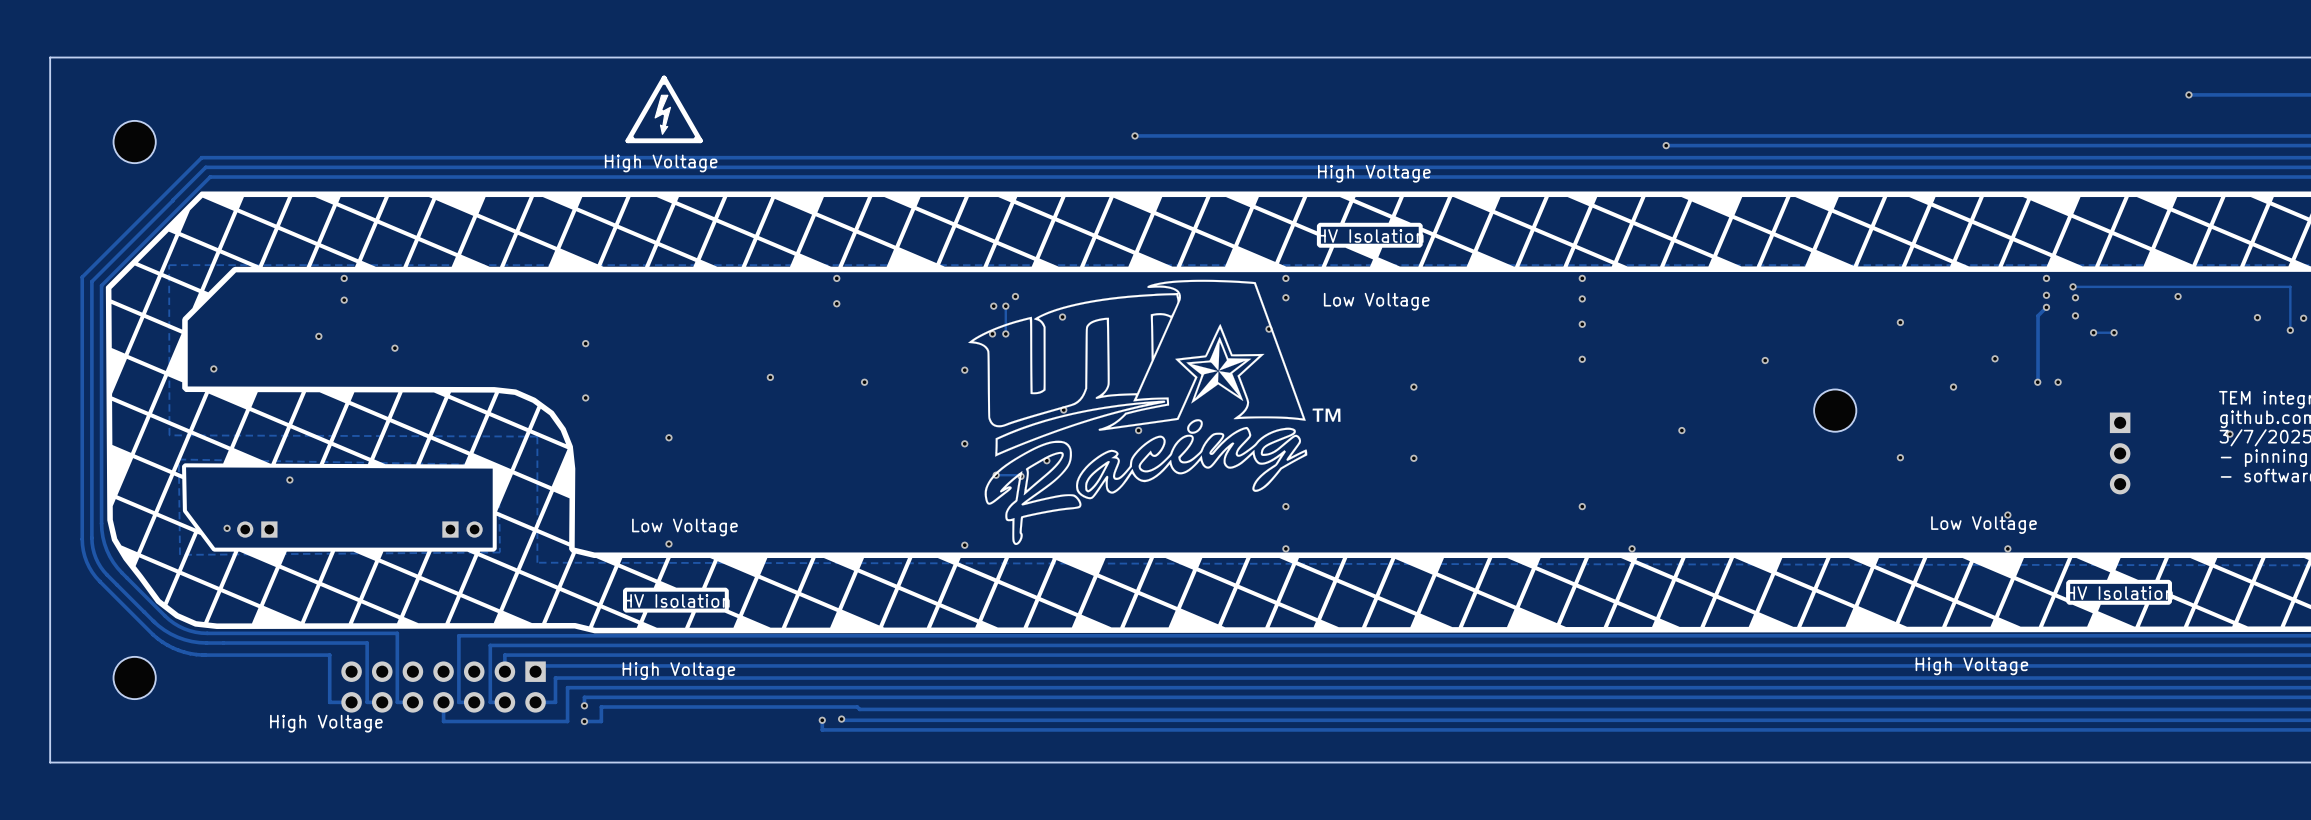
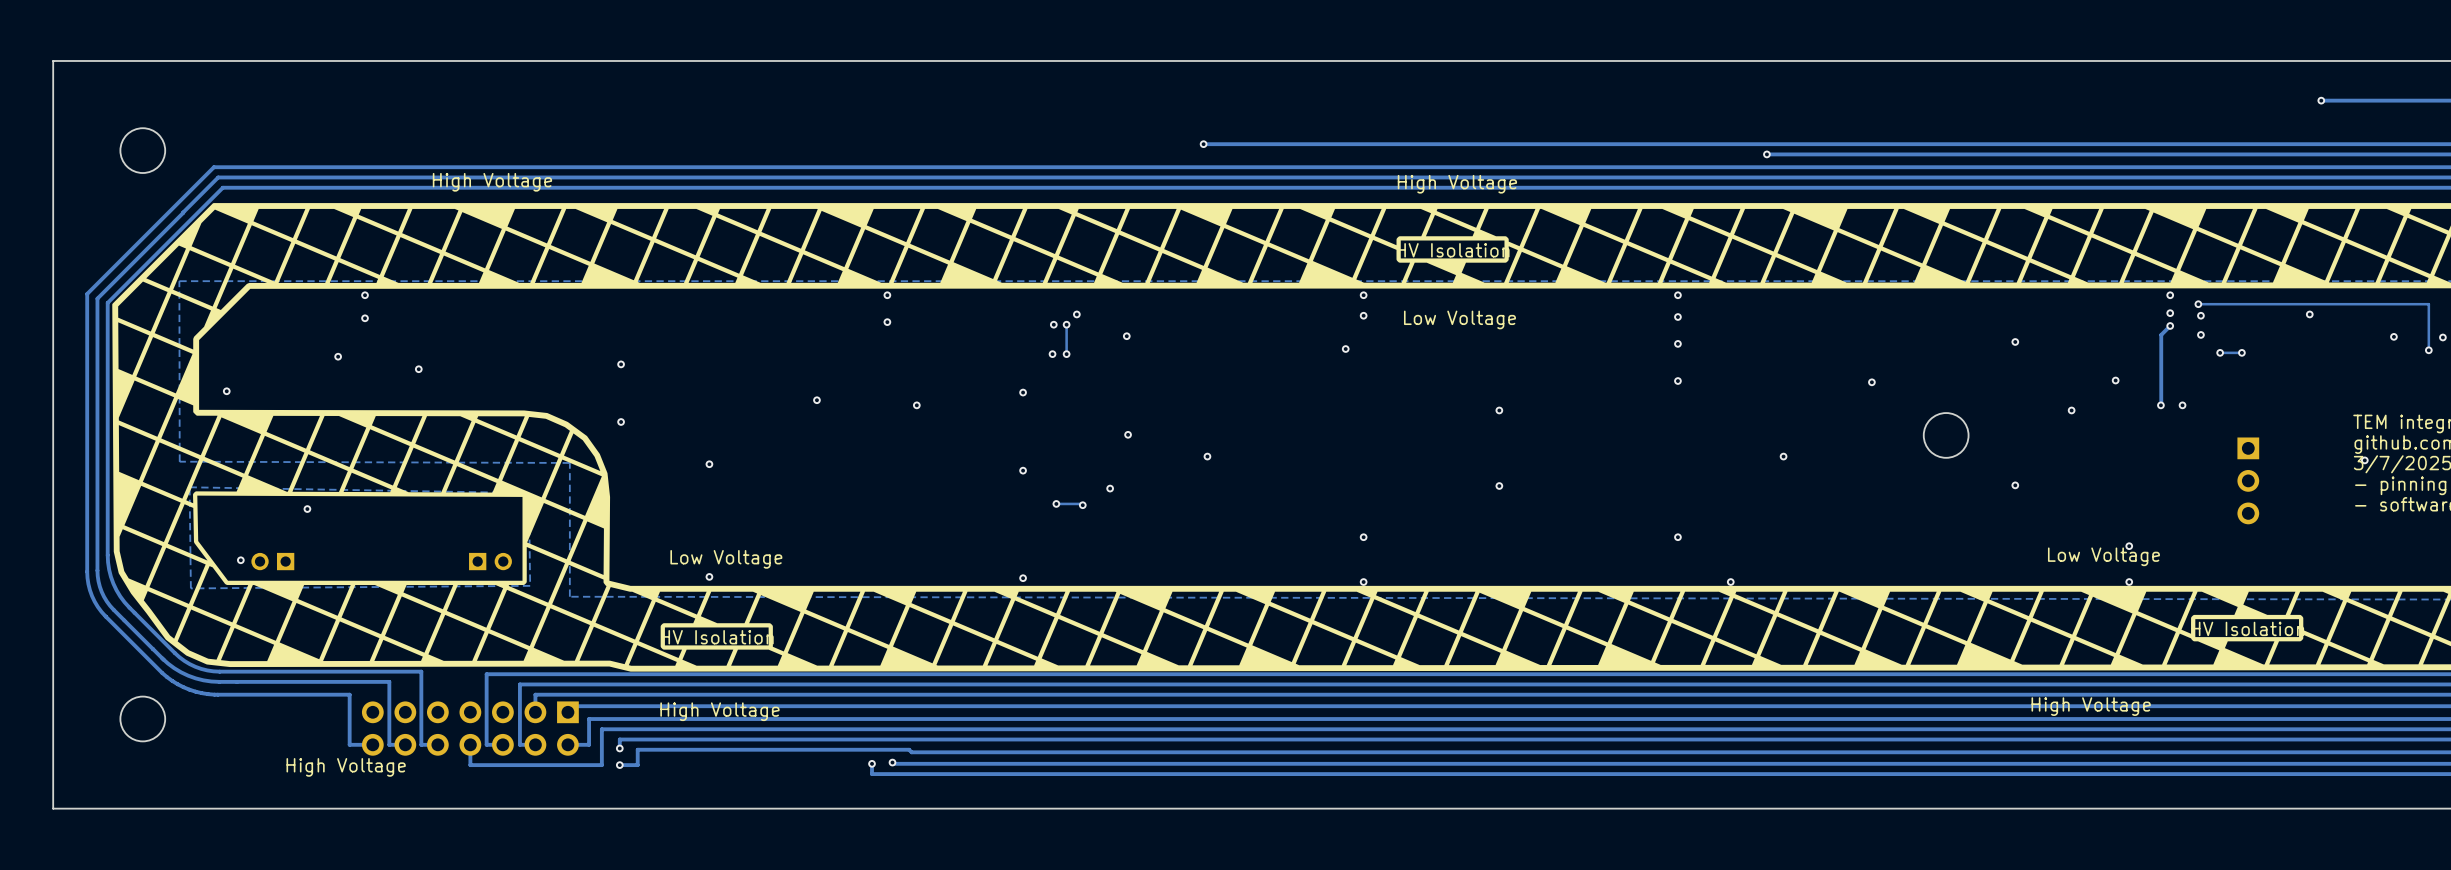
drawing: [625, 75, 703, 144] -> none
text position: High Voltage (661, 163) -> High Voltage (492, 182)
drawing: [968, 279, 1341, 546] -> none

